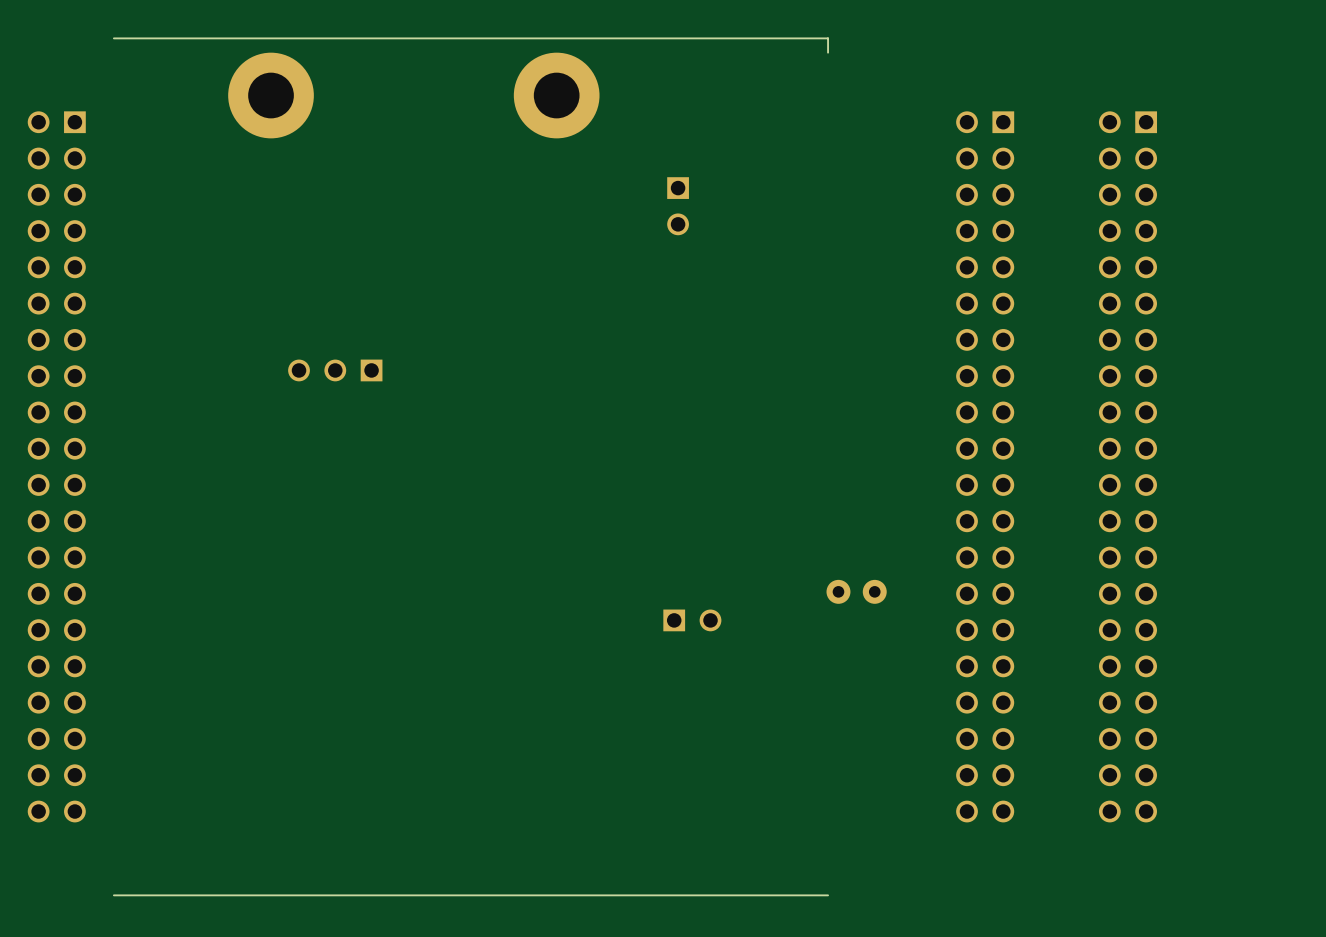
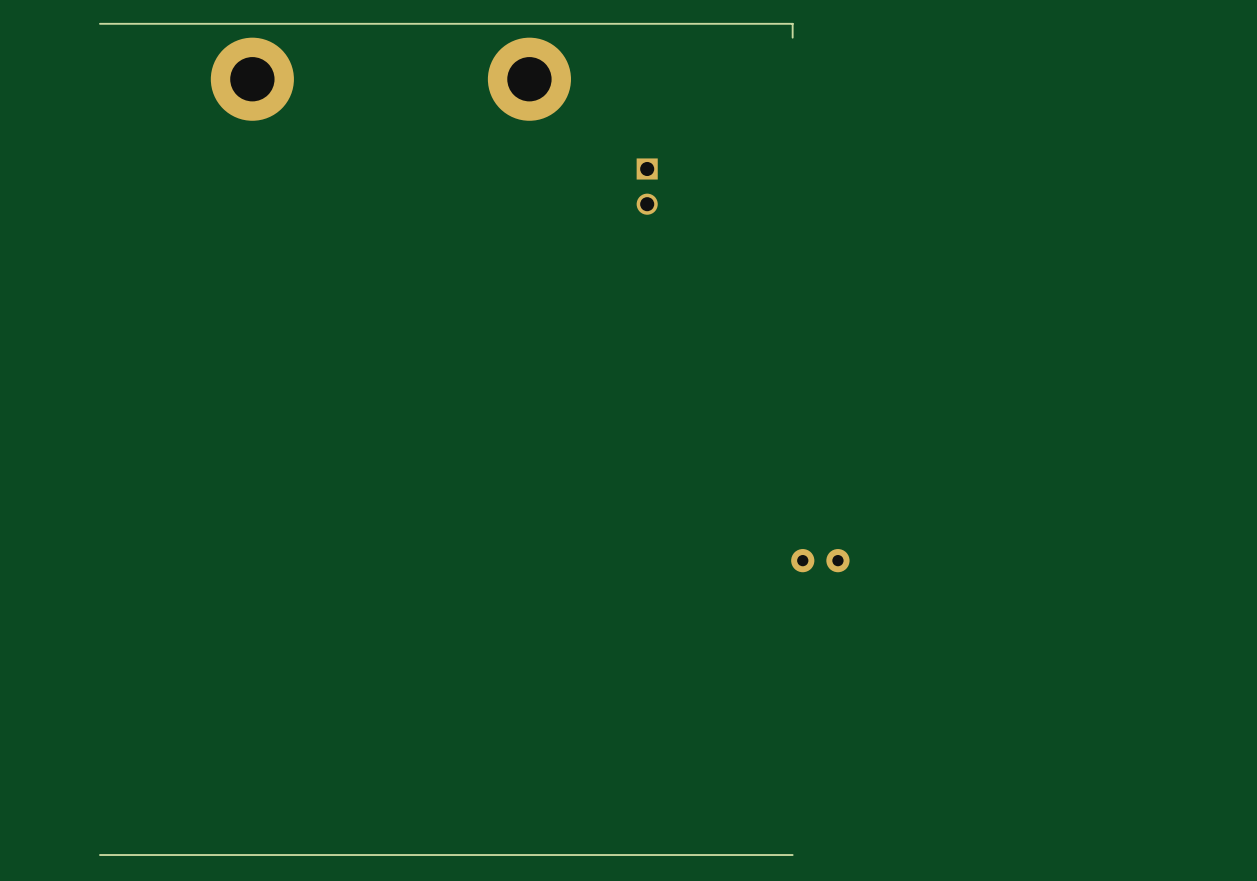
part: (335, 370) -> none
part: (56, 466) -> none
part: (985, 466) -> none
part: (1127, 466) -> none
part: (692, 620) -> none

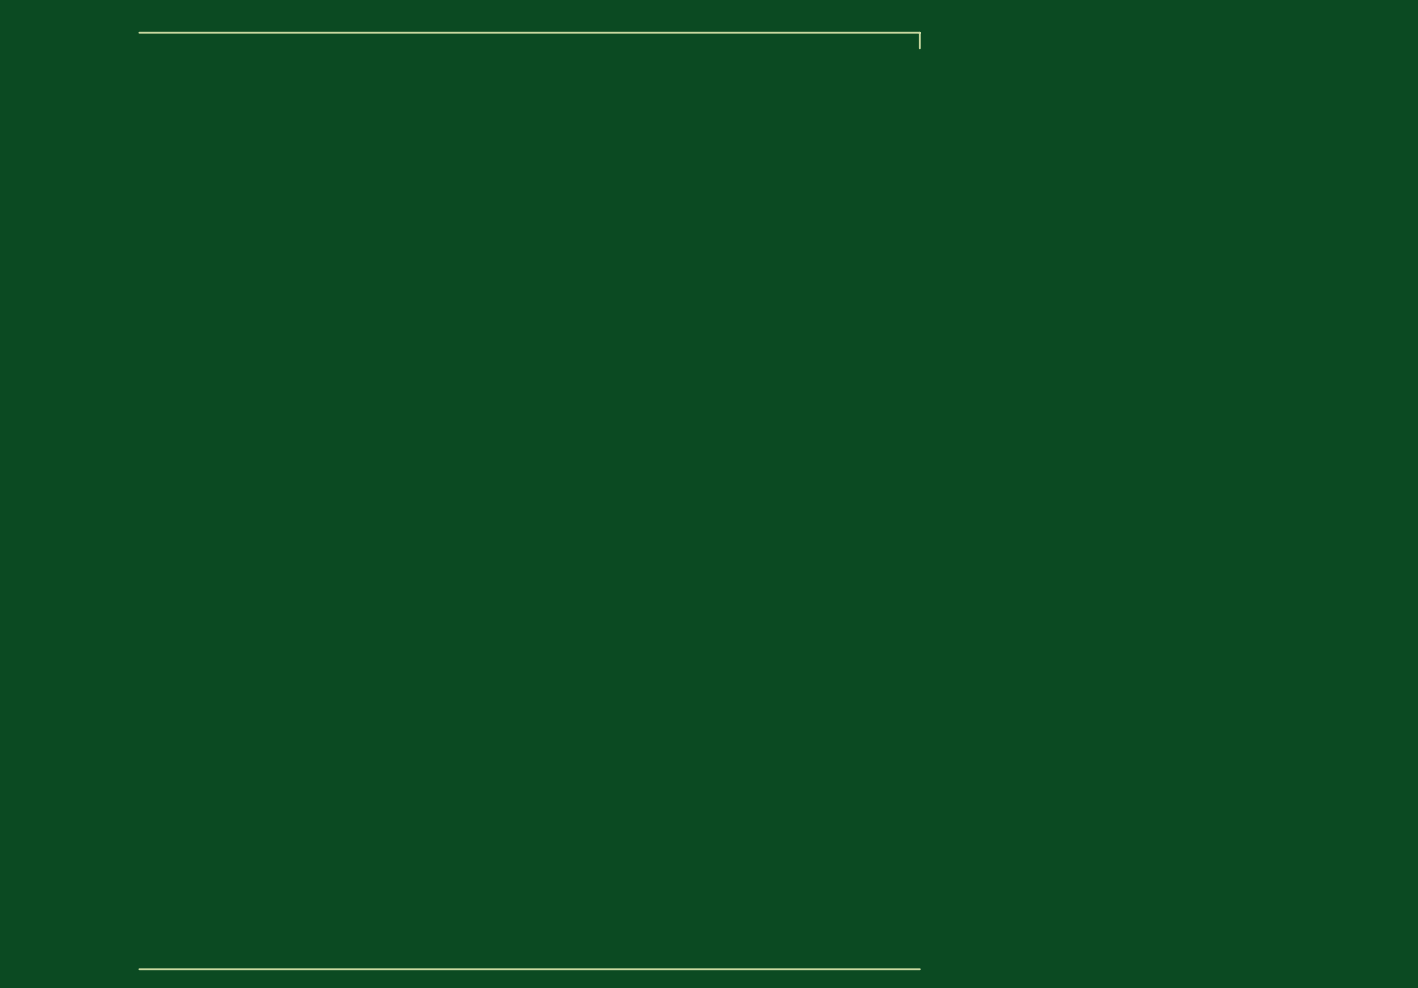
part: (252, 79) -> none
part: (529, 79) -> none
part: (647, 186) -> none
part: (820, 560) -> none

